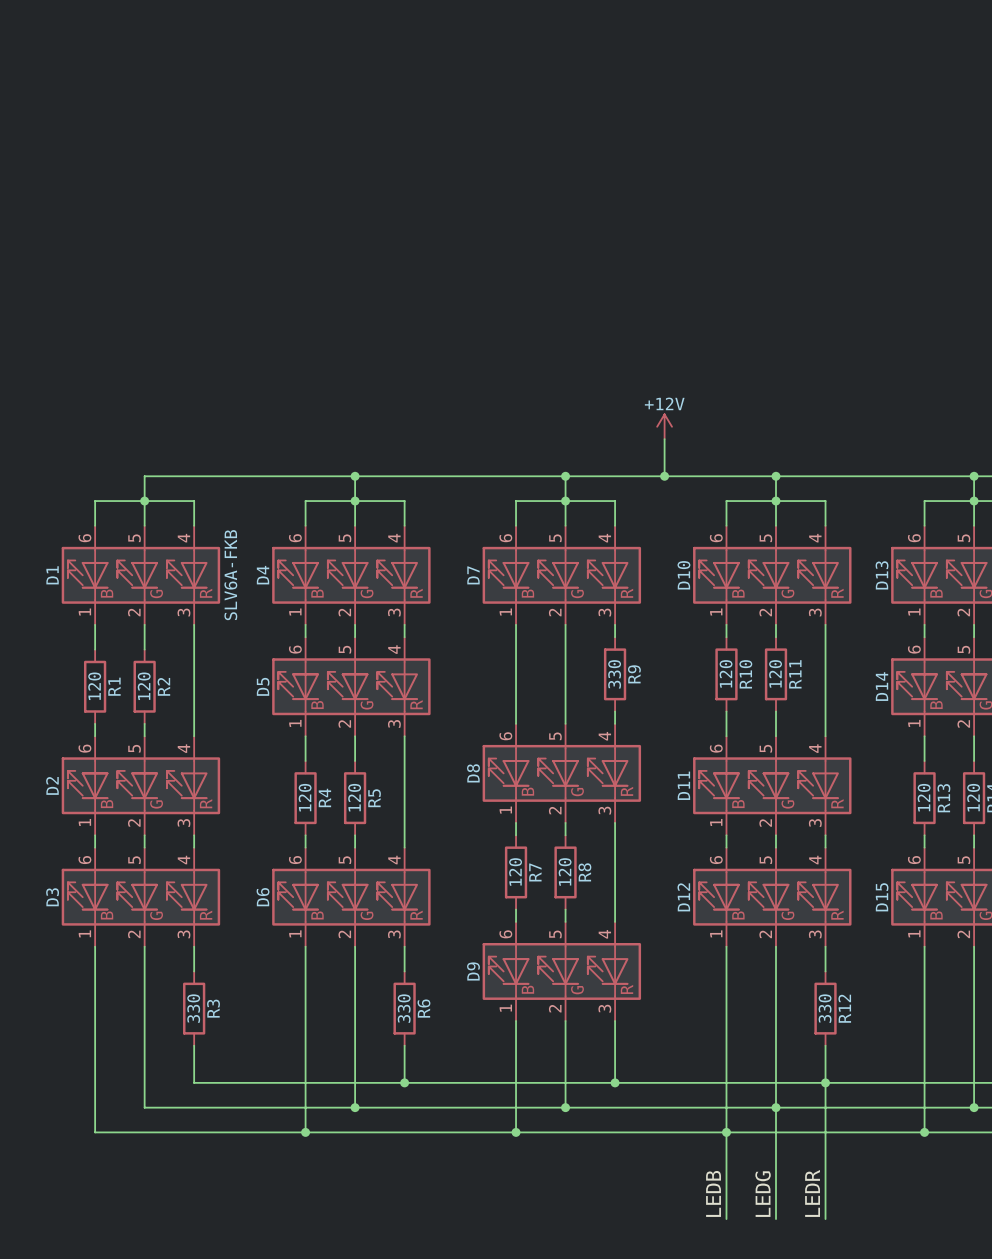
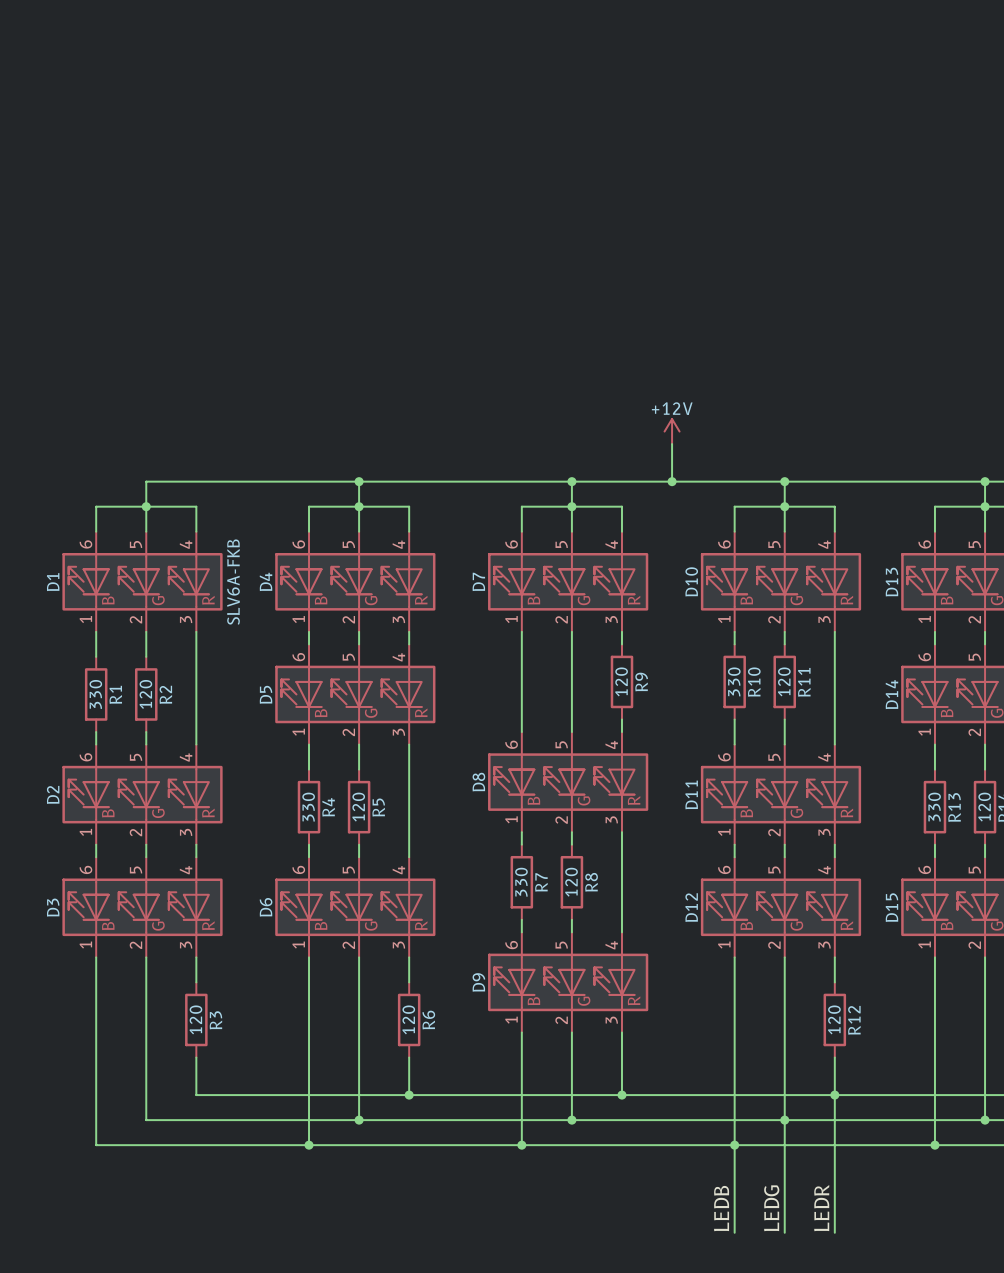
R10 value: 120 (726, 673) -> 330 (734, 681)
R9 value: 330 (614, 674) -> 120 (621, 681)
R1 value: 120 (94, 686) -> 330 (95, 694)
R4 value: 120 (305, 797) -> 330 (308, 807)
R13 value: 120 (924, 797) -> 330 (934, 807)
R7 value: 120 (515, 871) -> 330 (521, 882)
R3 value: 330 (193, 1008) -> 120 (195, 1019)
R6 value: 330 (404, 1008) -> 120 (408, 1019)
R12 value: 330 (825, 1008) -> 120 (834, 1019)

